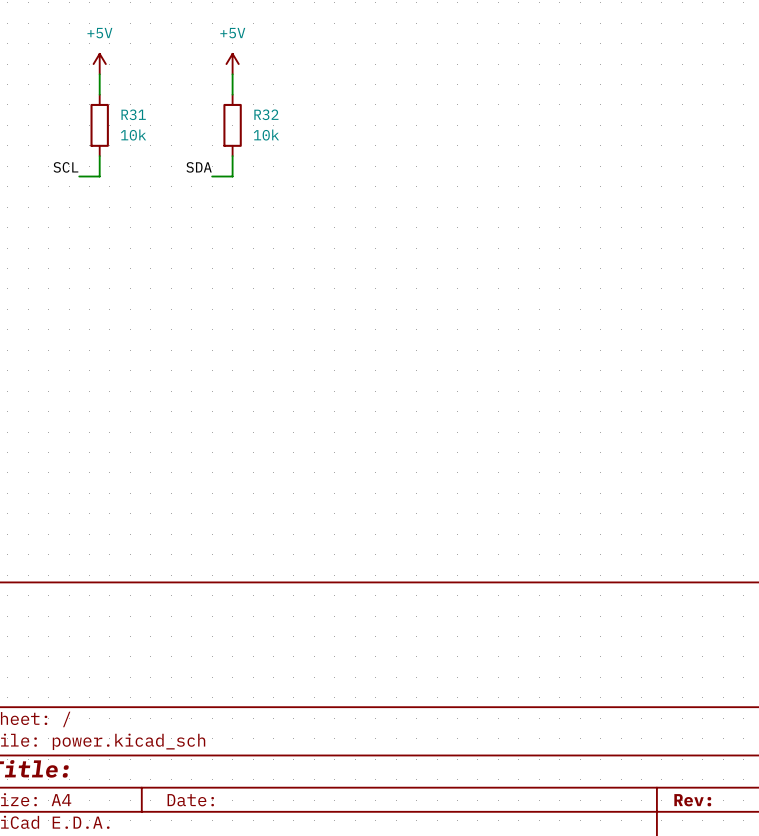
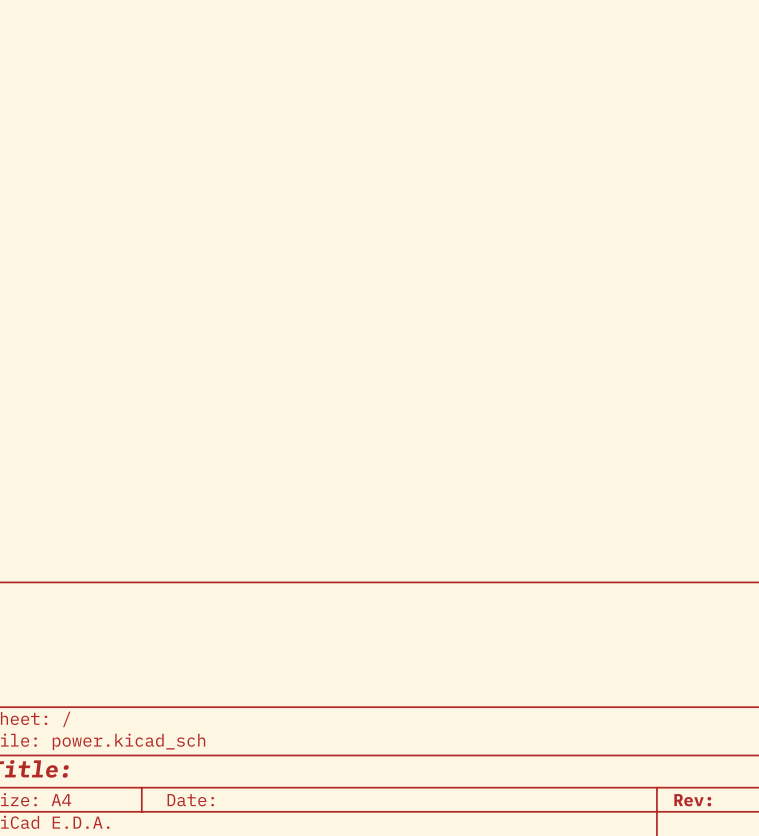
power symbol: +5V (99, 64) -> none
power symbol: +5V (232, 64) -> none
wire: (99, 74) (99, 94) -> none
wire: (232, 74) (232, 94) -> none
R31: 10k (99, 125) -> none
R32: 10k (232, 125) -> none
wire: (99, 156) (99, 176) (79, 176) -> none
wire: (232, 156) (232, 176) (212, 176) -> none
label: SCL (65, 167) -> none
label: SDA (199, 167) -> none

